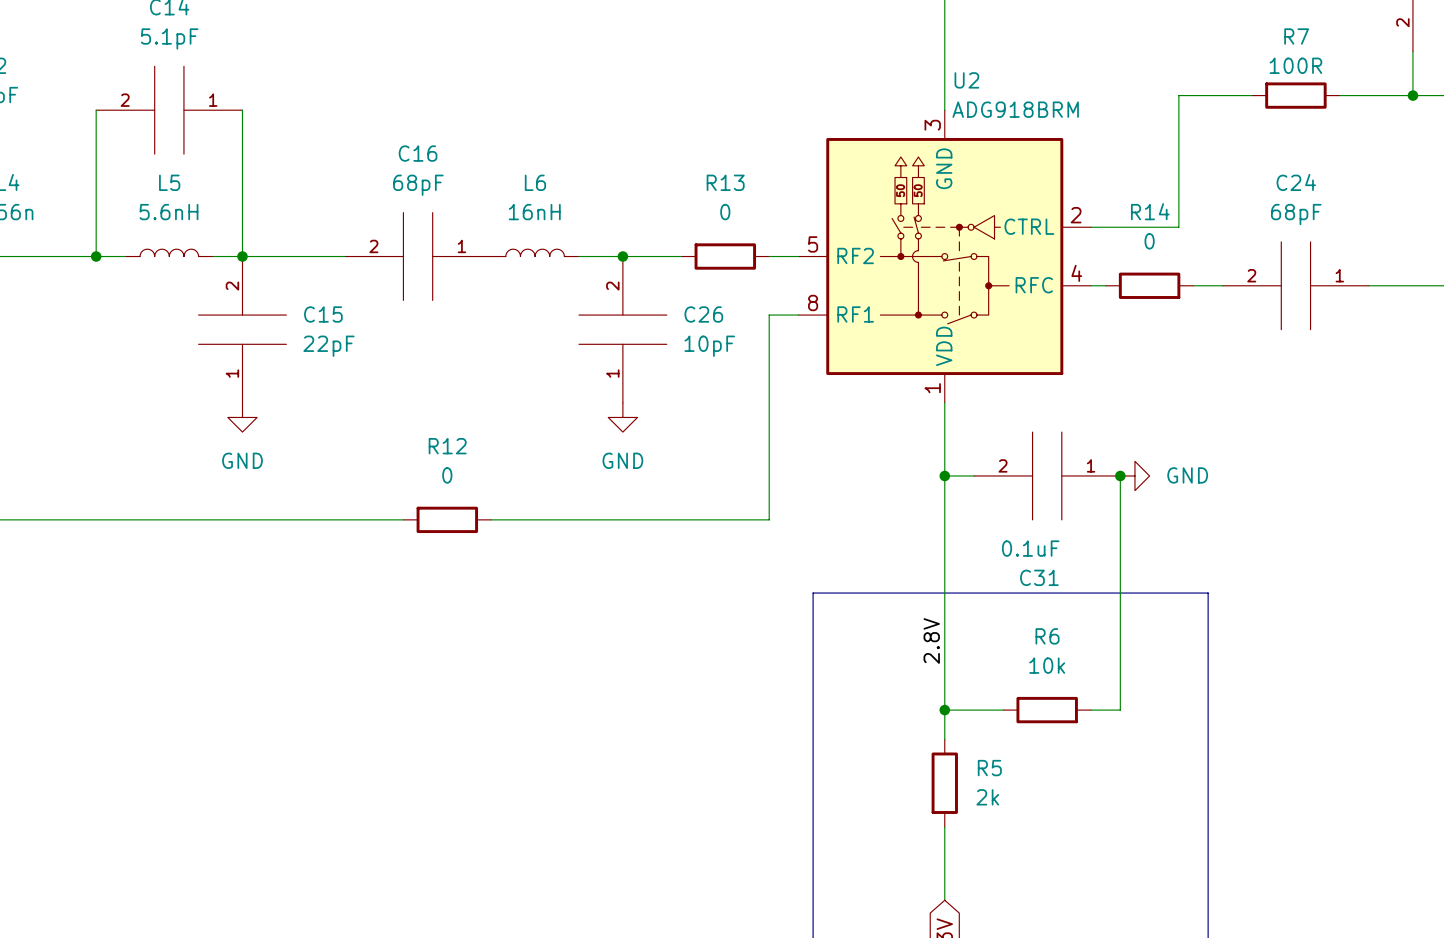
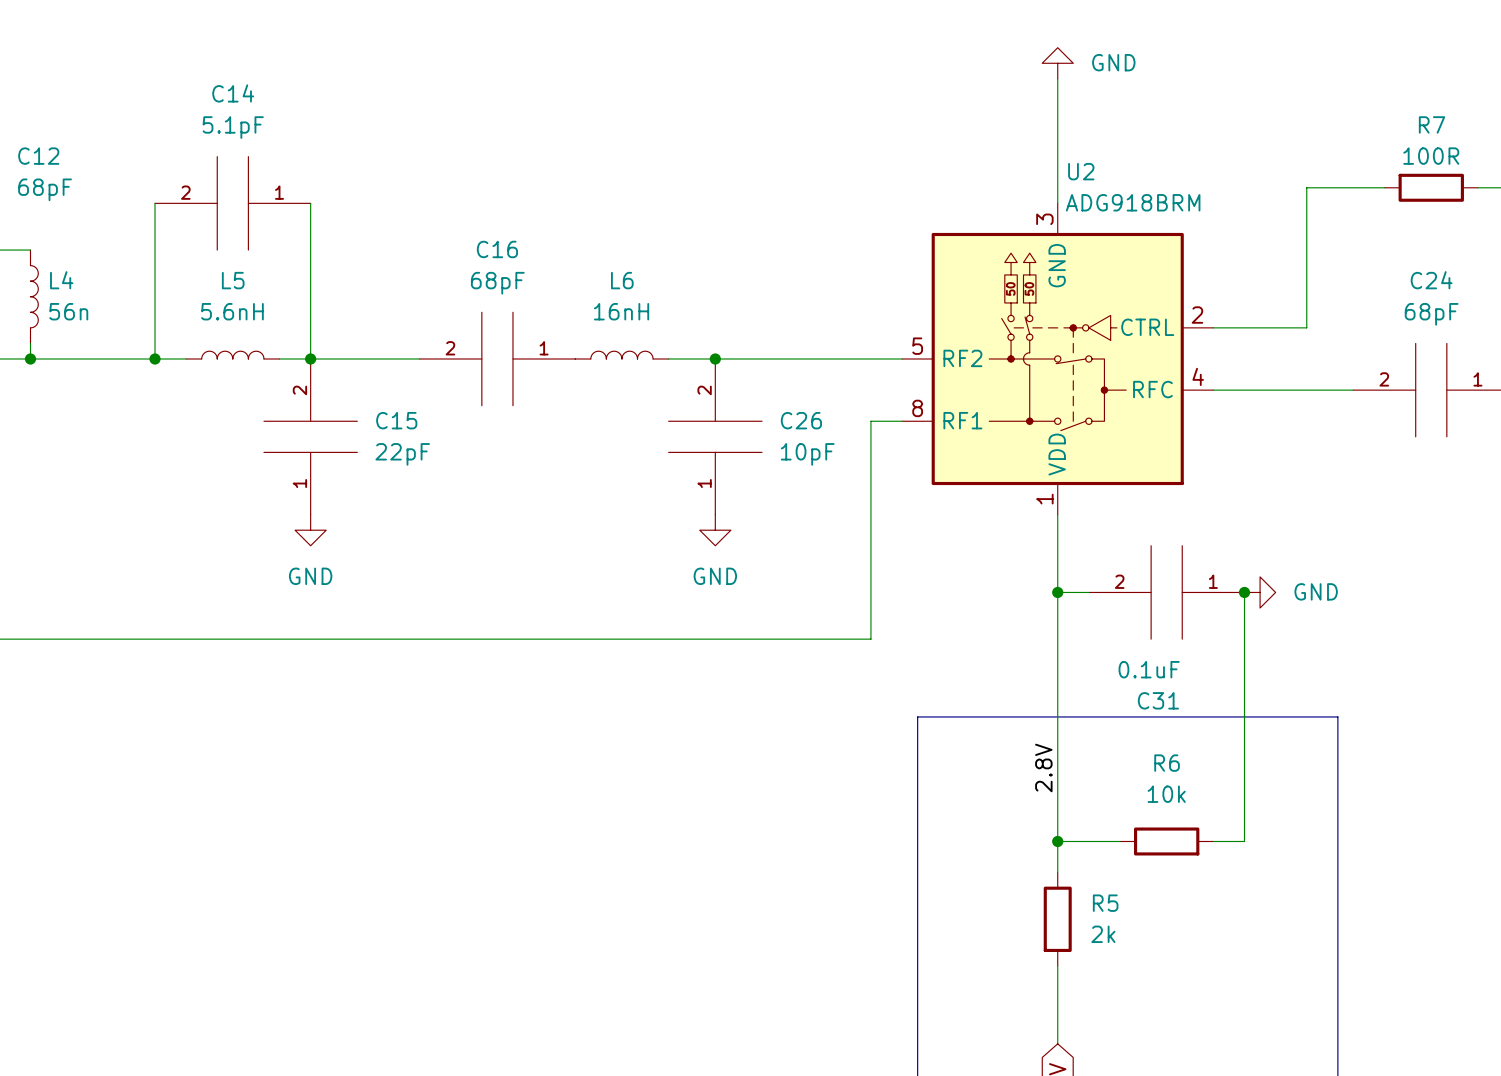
wire: none -> (777, 359) (870, 359)
R13: 0 (725, 256) -> none
wire: none -> (1228, 390) (1322, 390)
R14: 0 (1149, 285) -> none
wire: none -> (481, 639) (575, 639)
R12: 0 (447, 519) -> none

